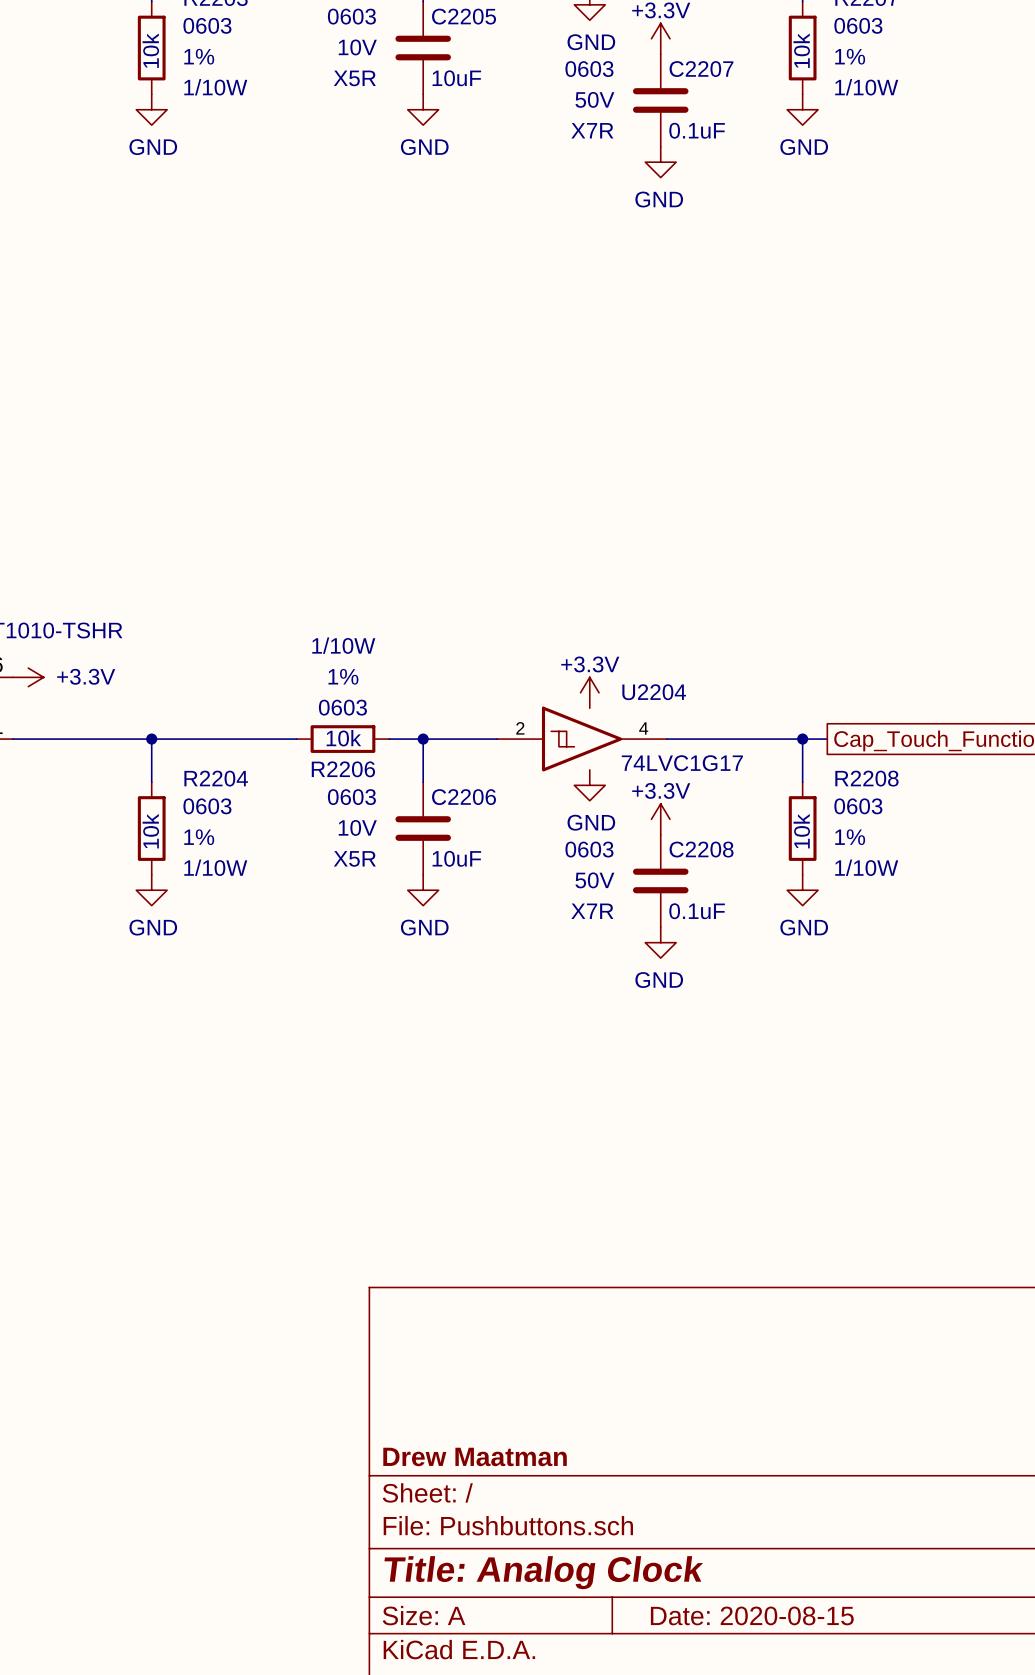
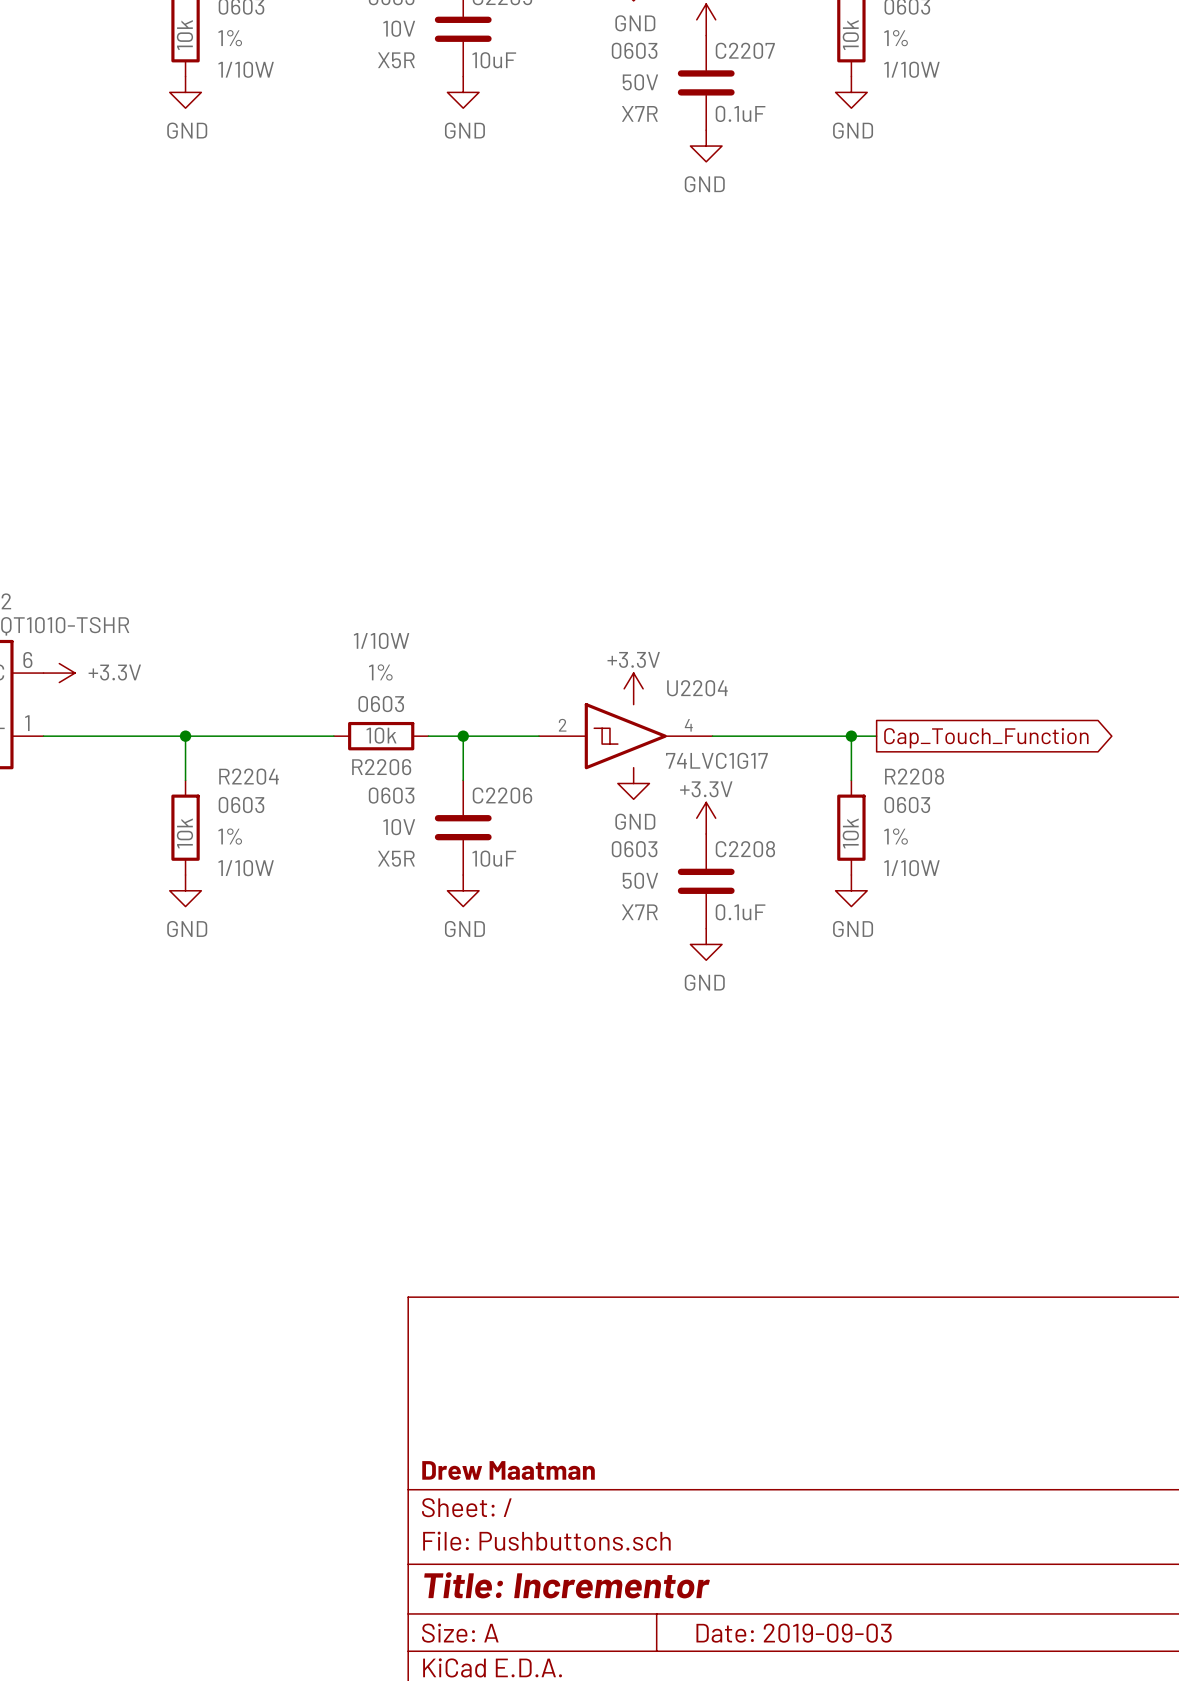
title block: Title: Analog Clock (543, 1572) -> Title: Incrementor (567, 1585)
title block: Date: 2020-08-15 (752, 1615) -> Date: 2019-09-03 (794, 1633)

